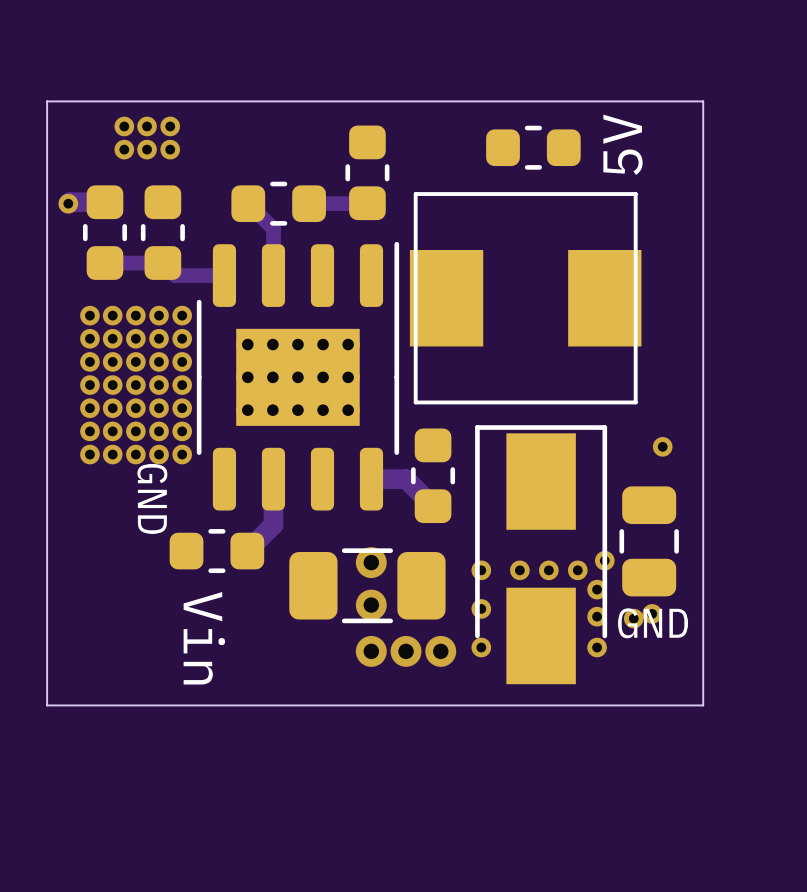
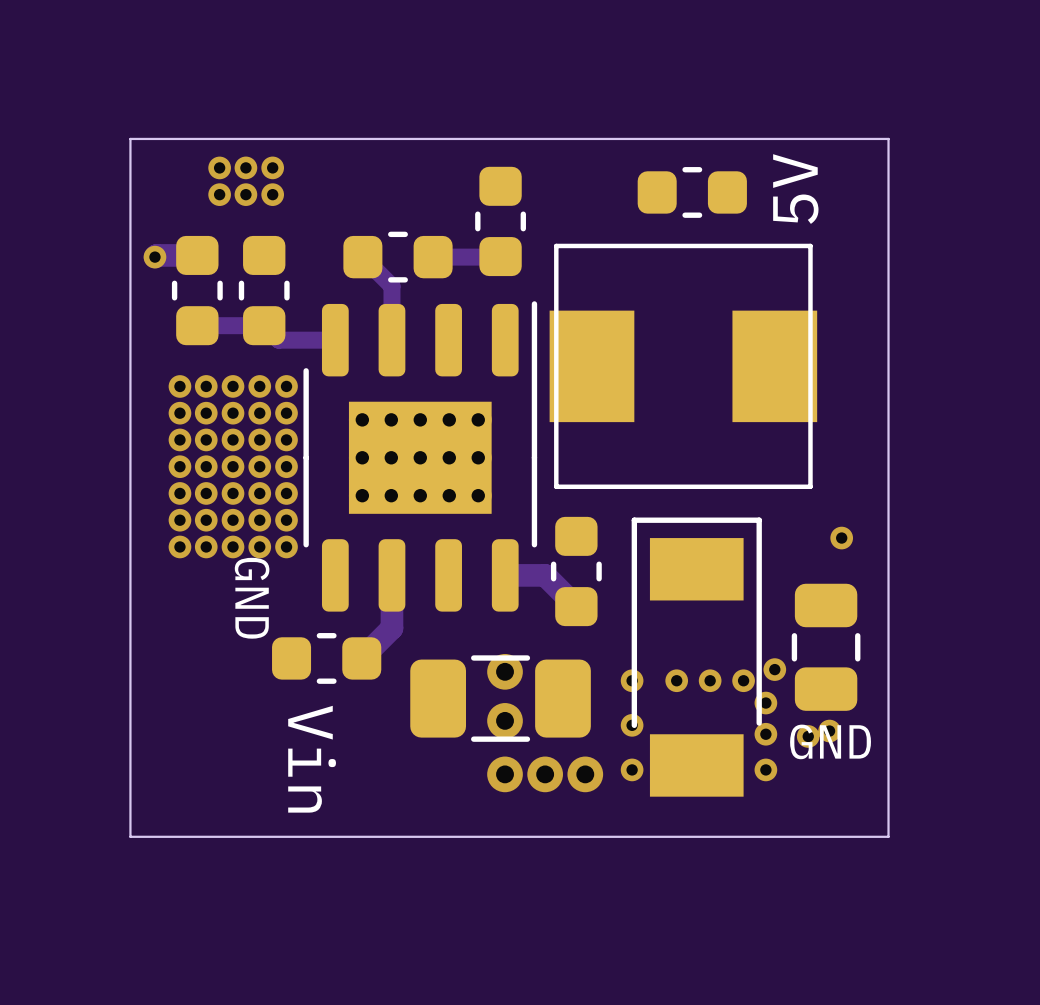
part footprint: [475, 425, 608, 685] -> [631, 517, 762, 797]

